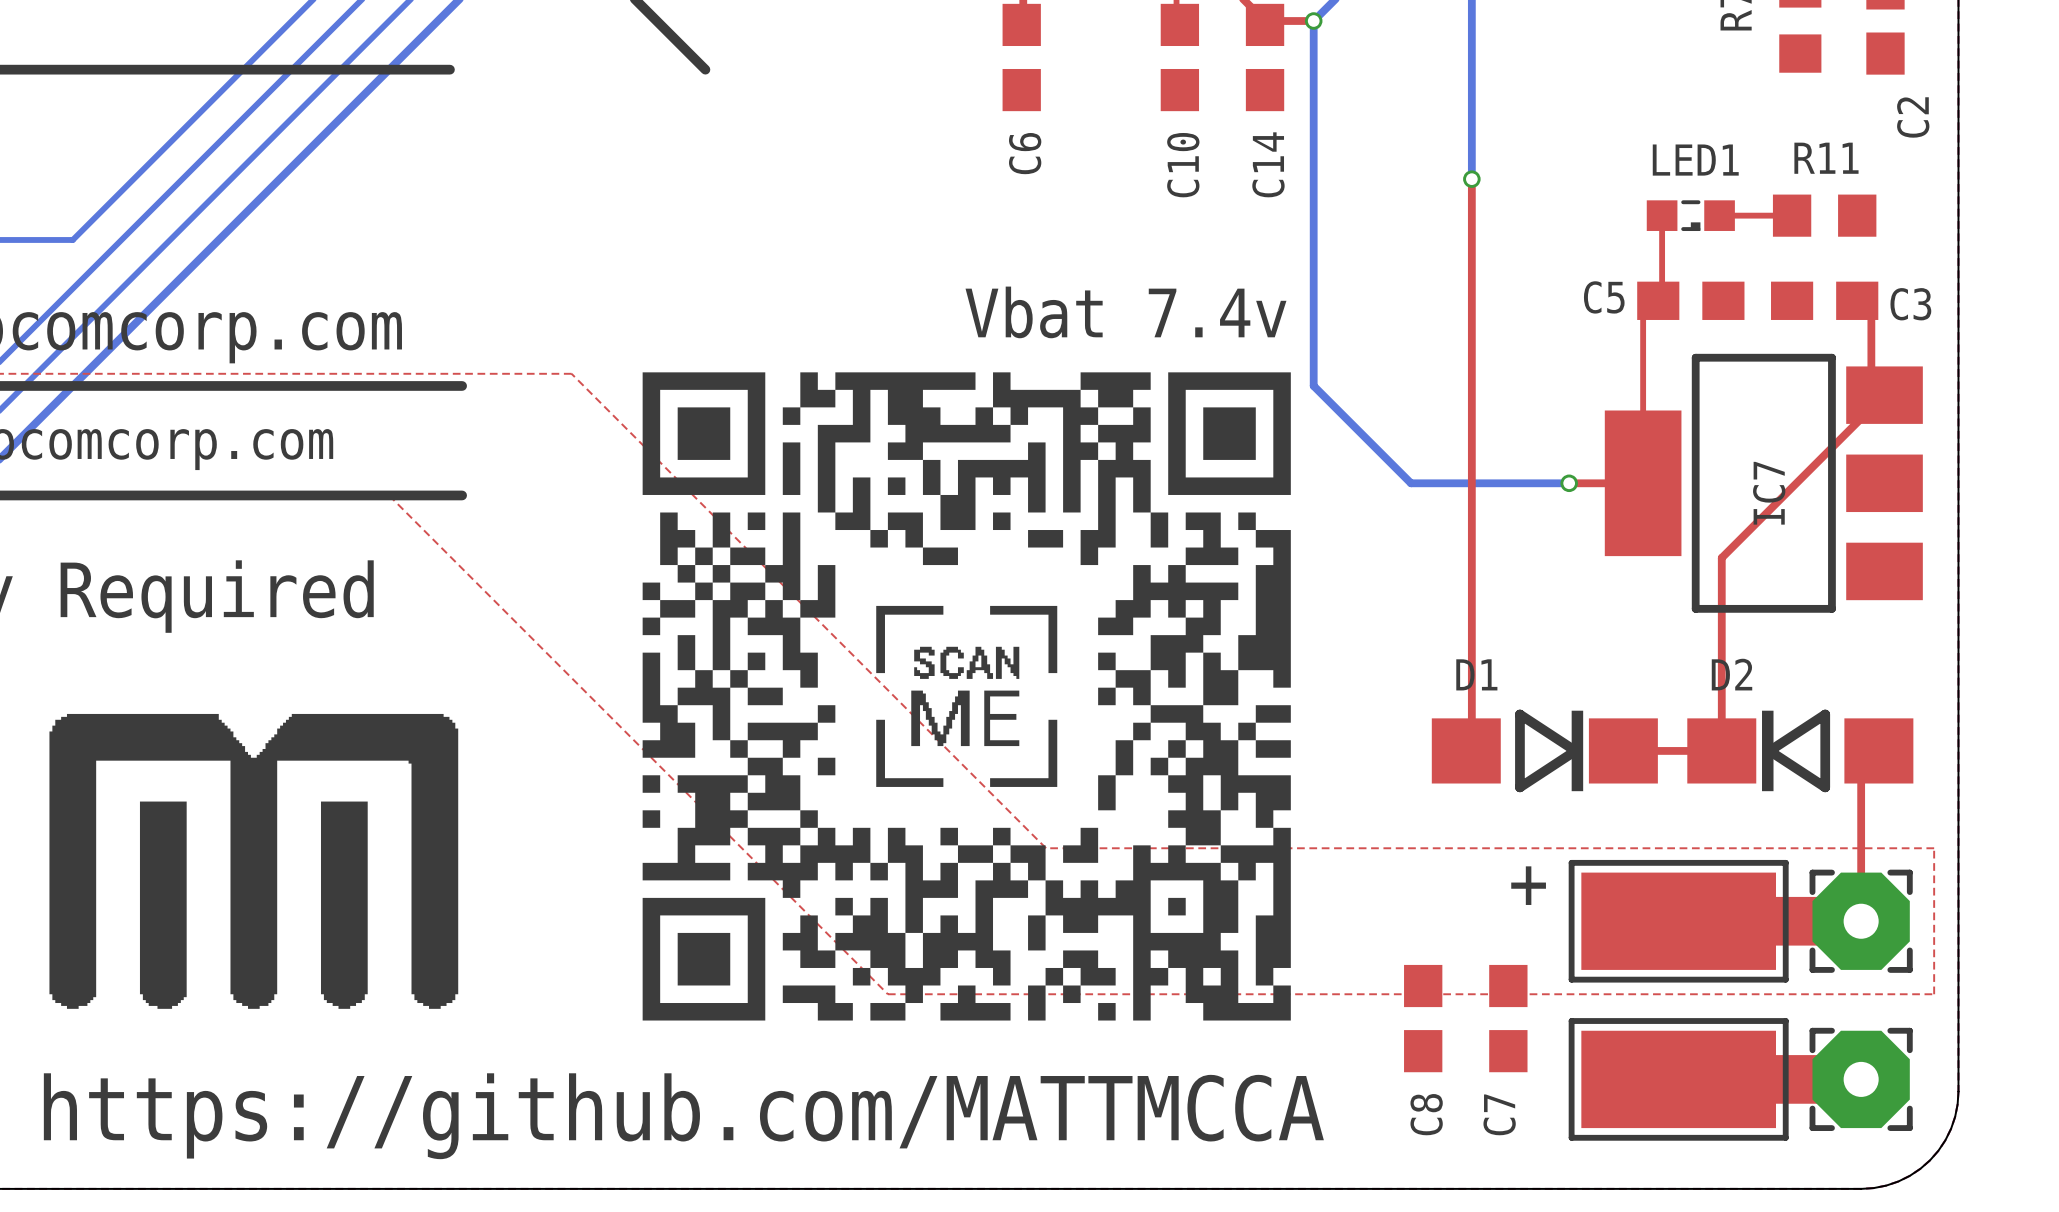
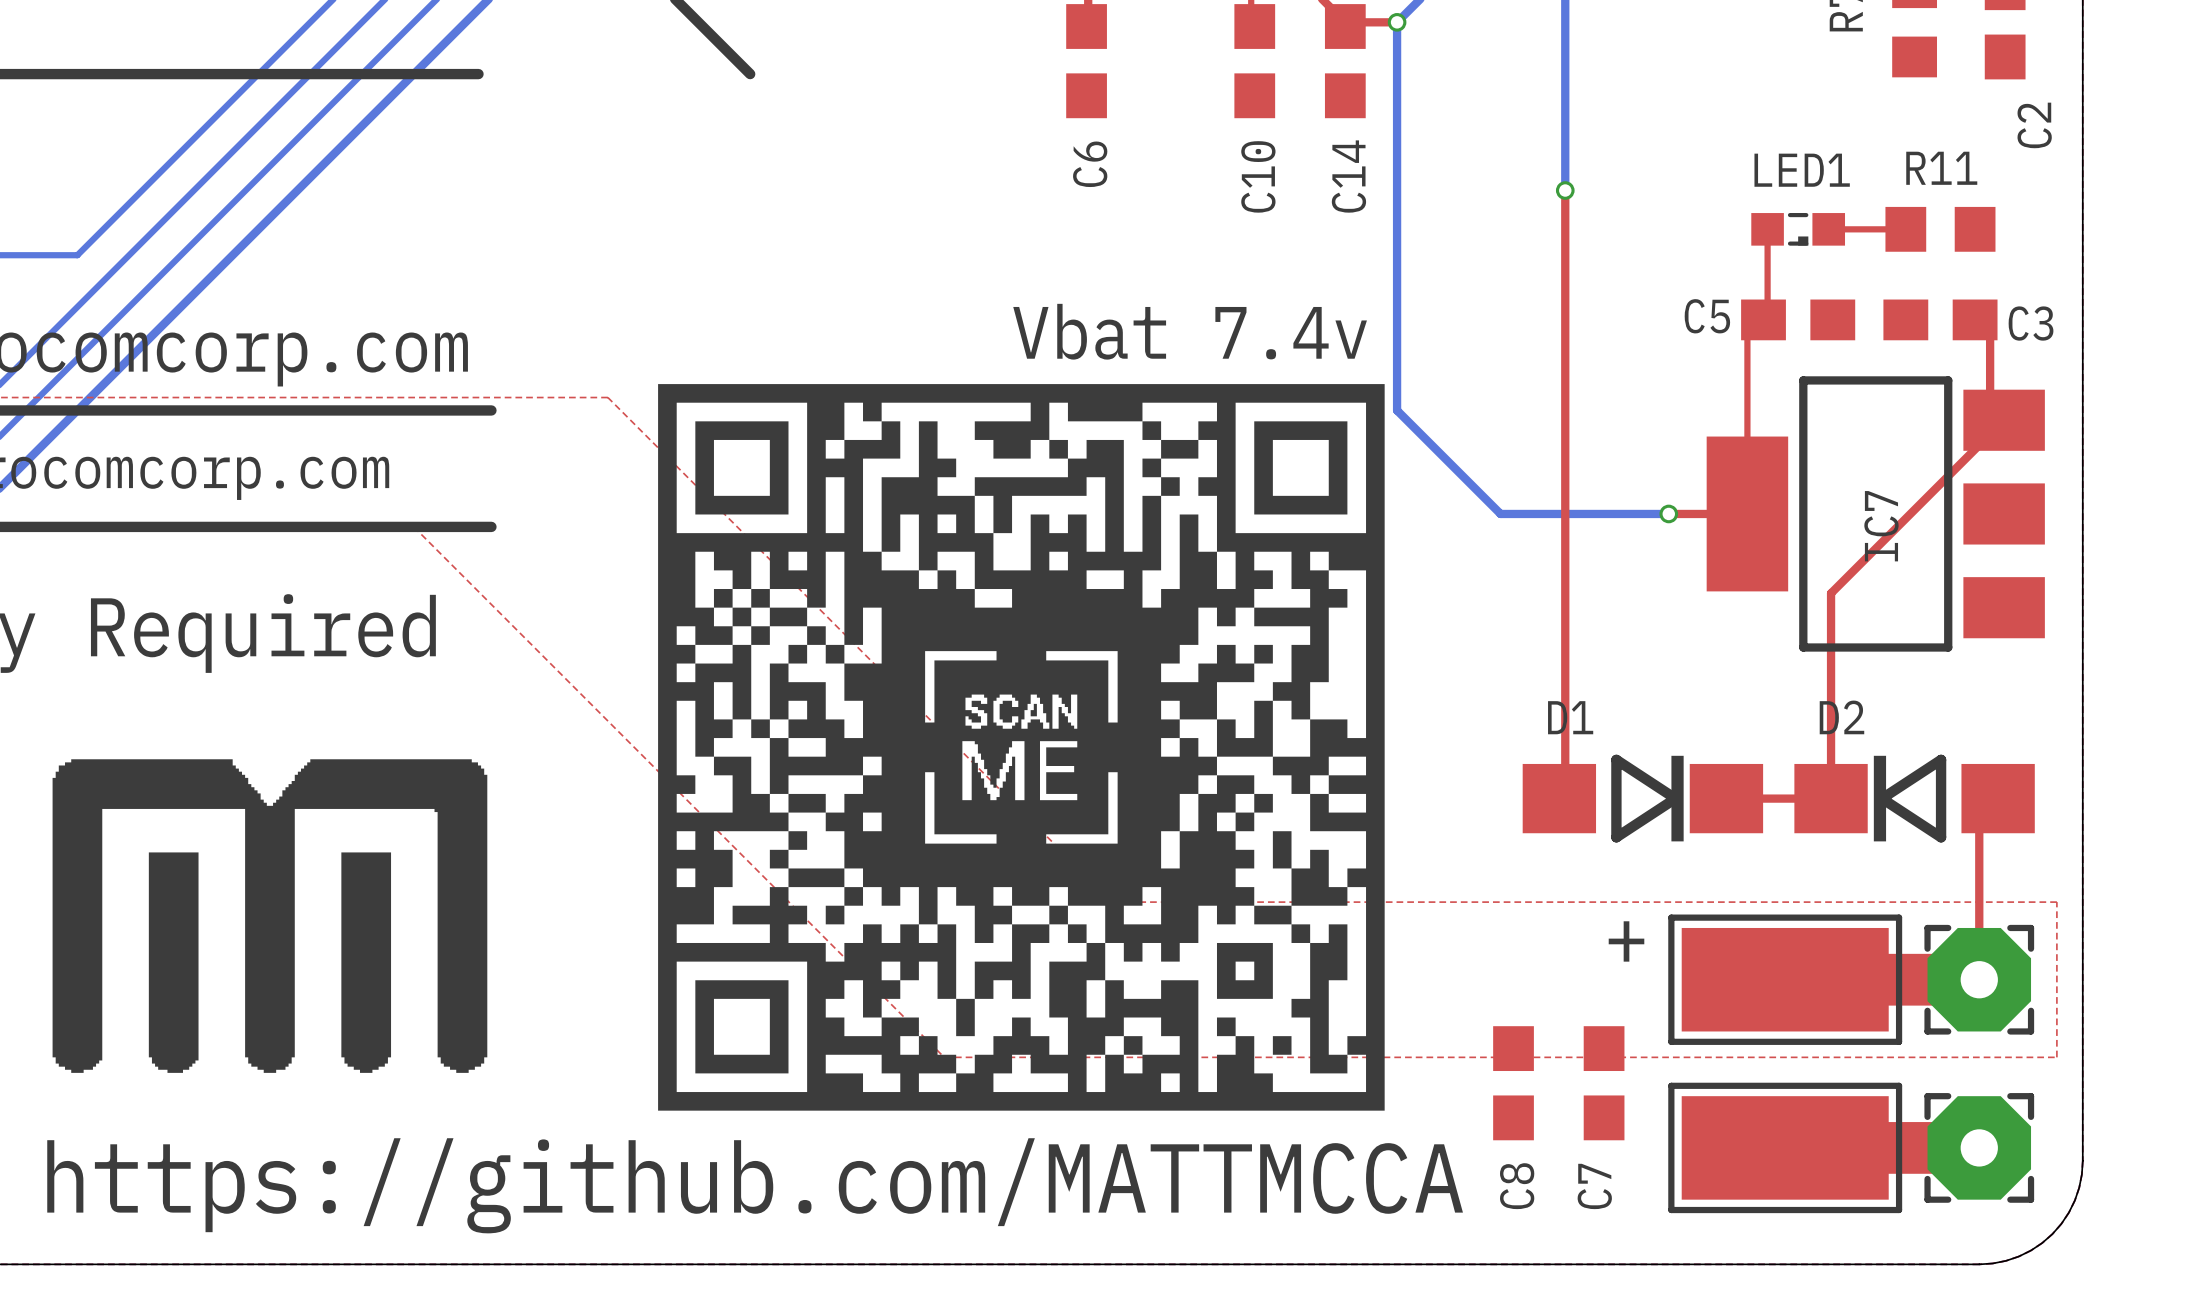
drawing shape: [642, 372, 1291, 1021] -> [658, 384, 1385, 1111]

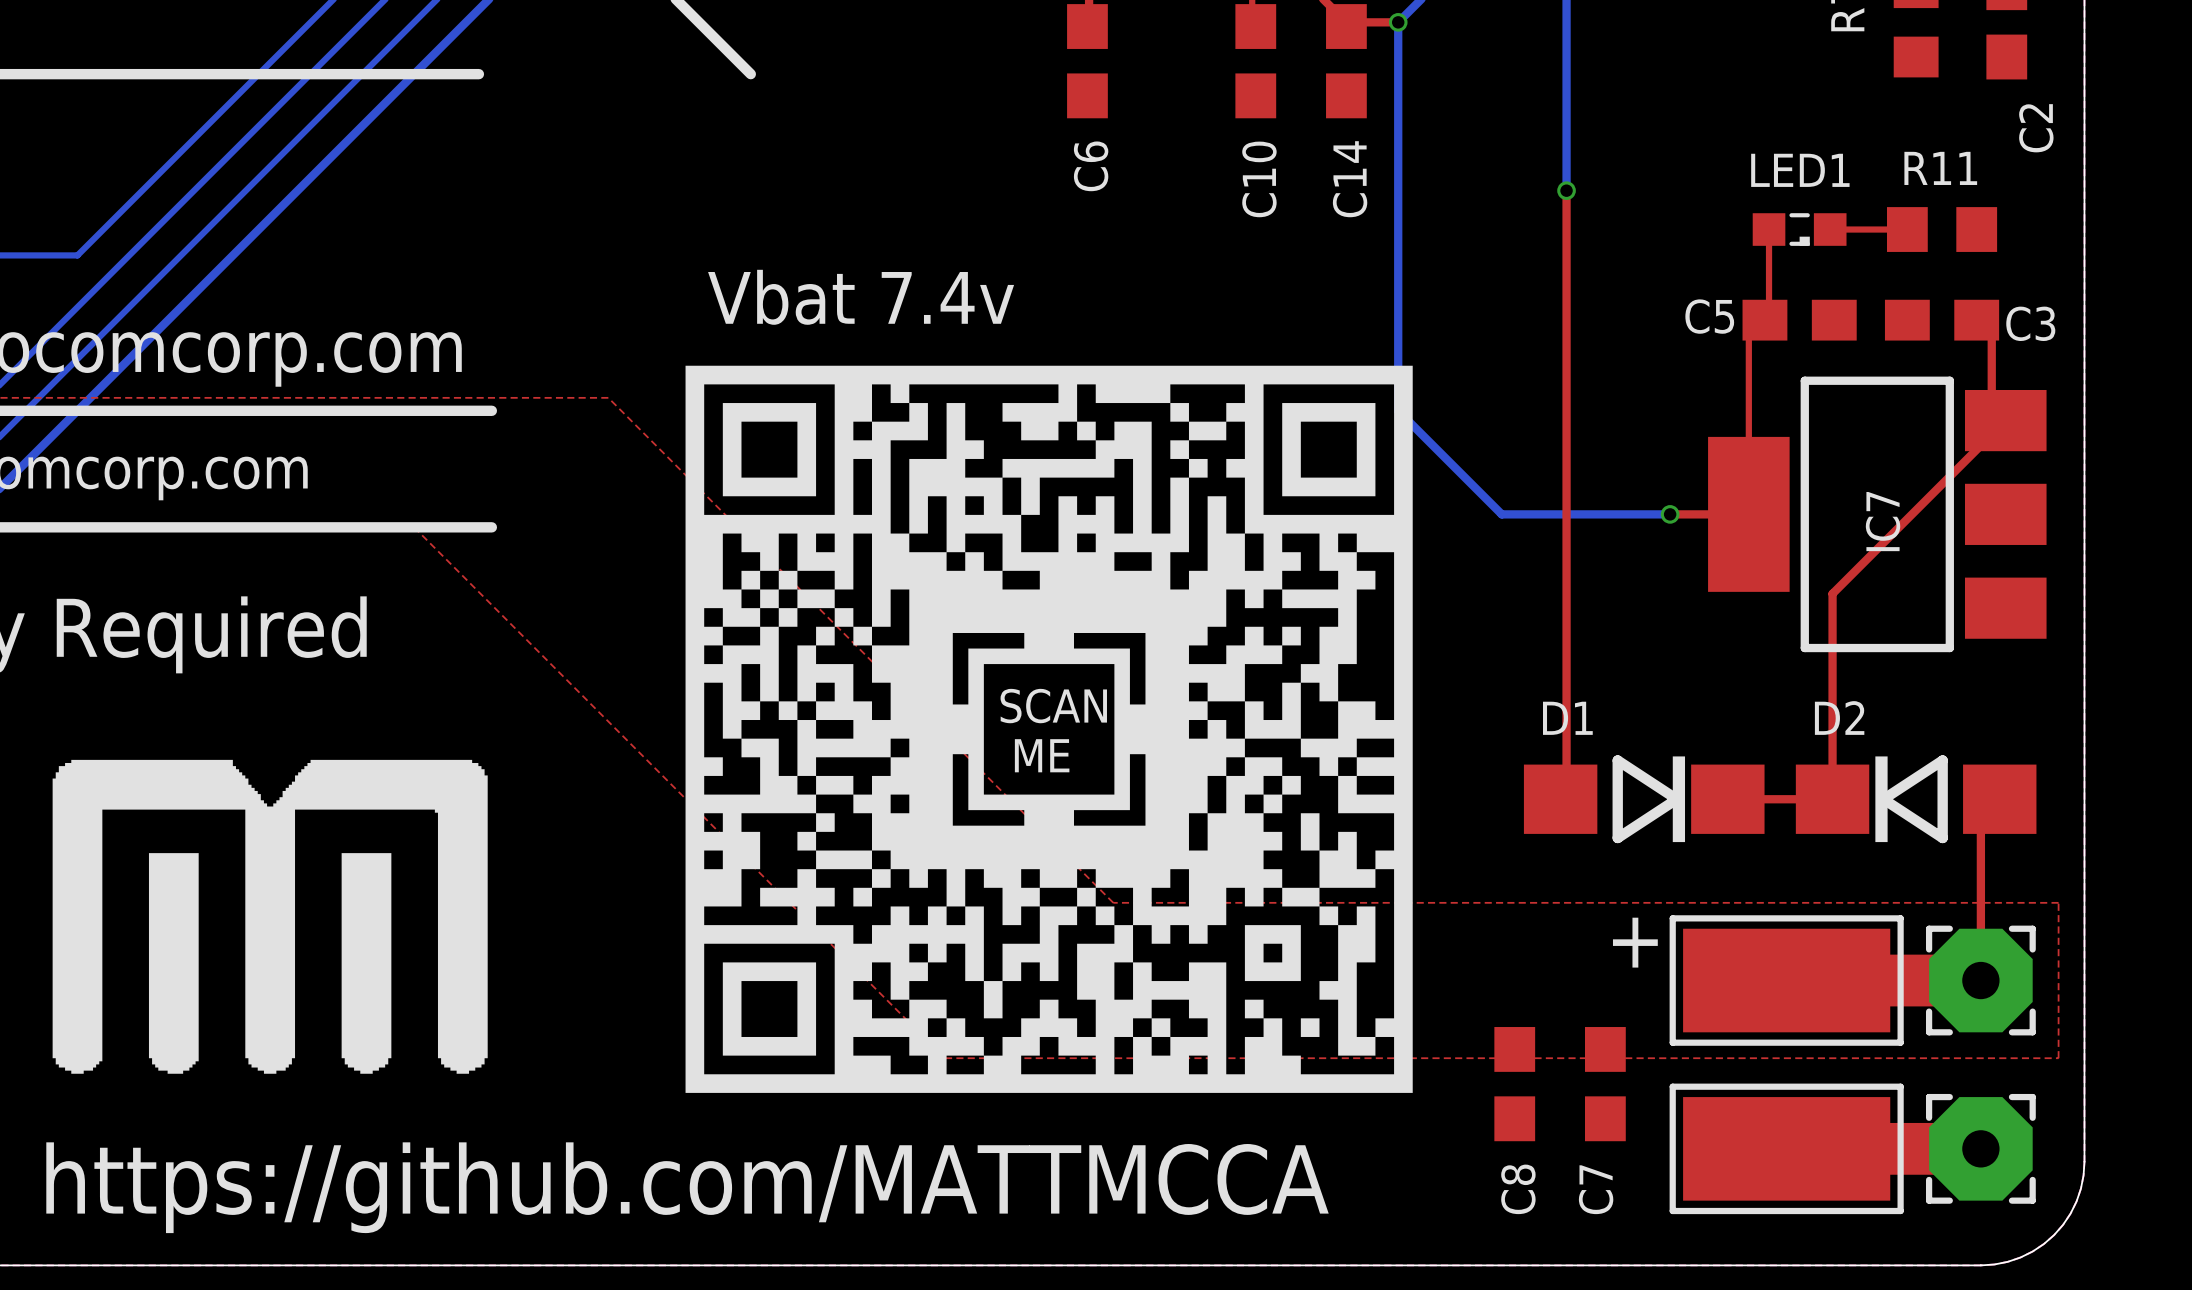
text position: Vbat 7.4v (1190, 331) -> Vbat 7.4v (861, 297)
drawing shape: [658, 384, 1385, 1111] -> [685, 365, 1413, 1093]
text: none -> SCAN (1053, 706)
text: none -> ME (1042, 755)

